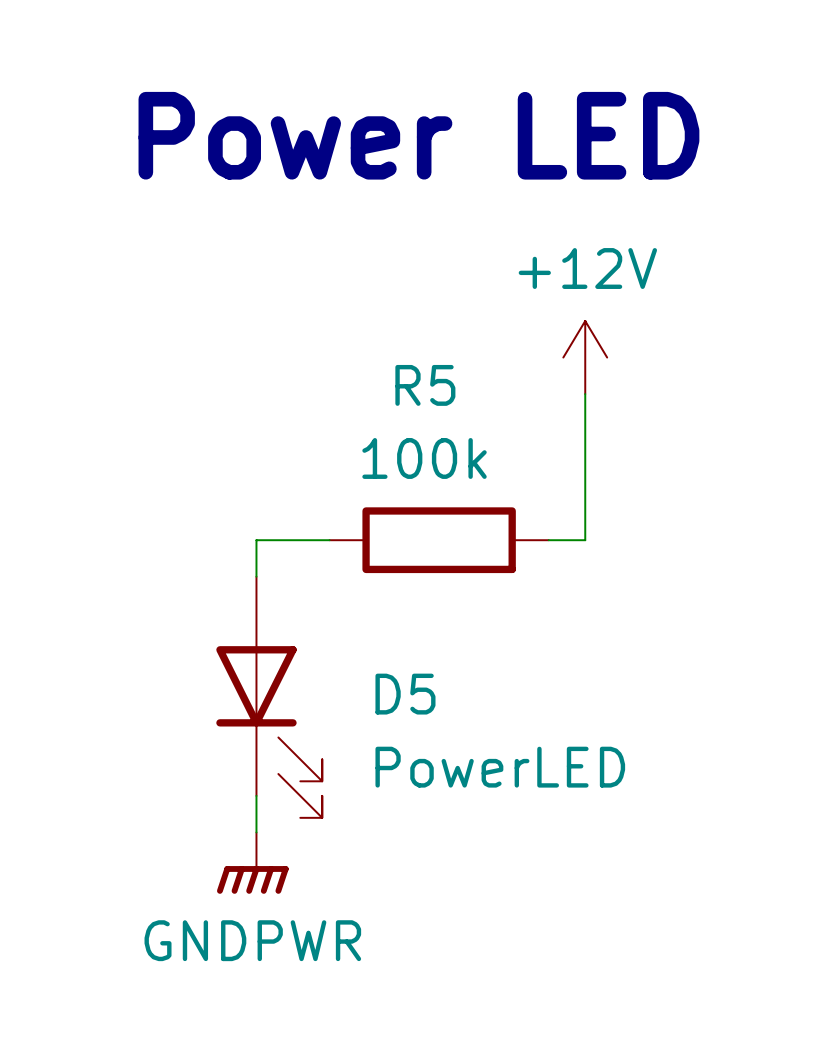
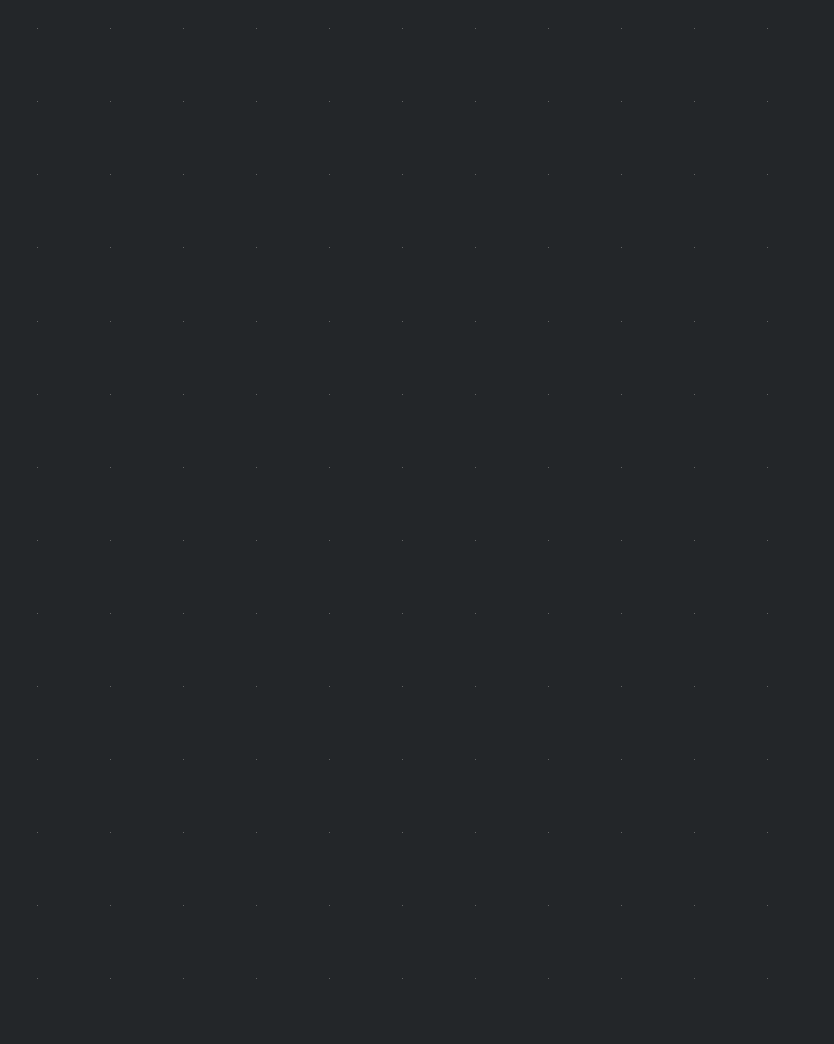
text: Power LED (418, 135) -> none
power symbol: +12V (585, 357) -> none
wire: (585, 394) (585, 540) (548, 540) -> none
wire: (329, 540) (256, 540) (256, 576) -> none
R5: 100k (439, 540) -> none
D5: PowerLED (269, 697) -> none
wire: (256, 795) (256, 832) -> none
power symbol: GNDPWR (252, 863) -> none

